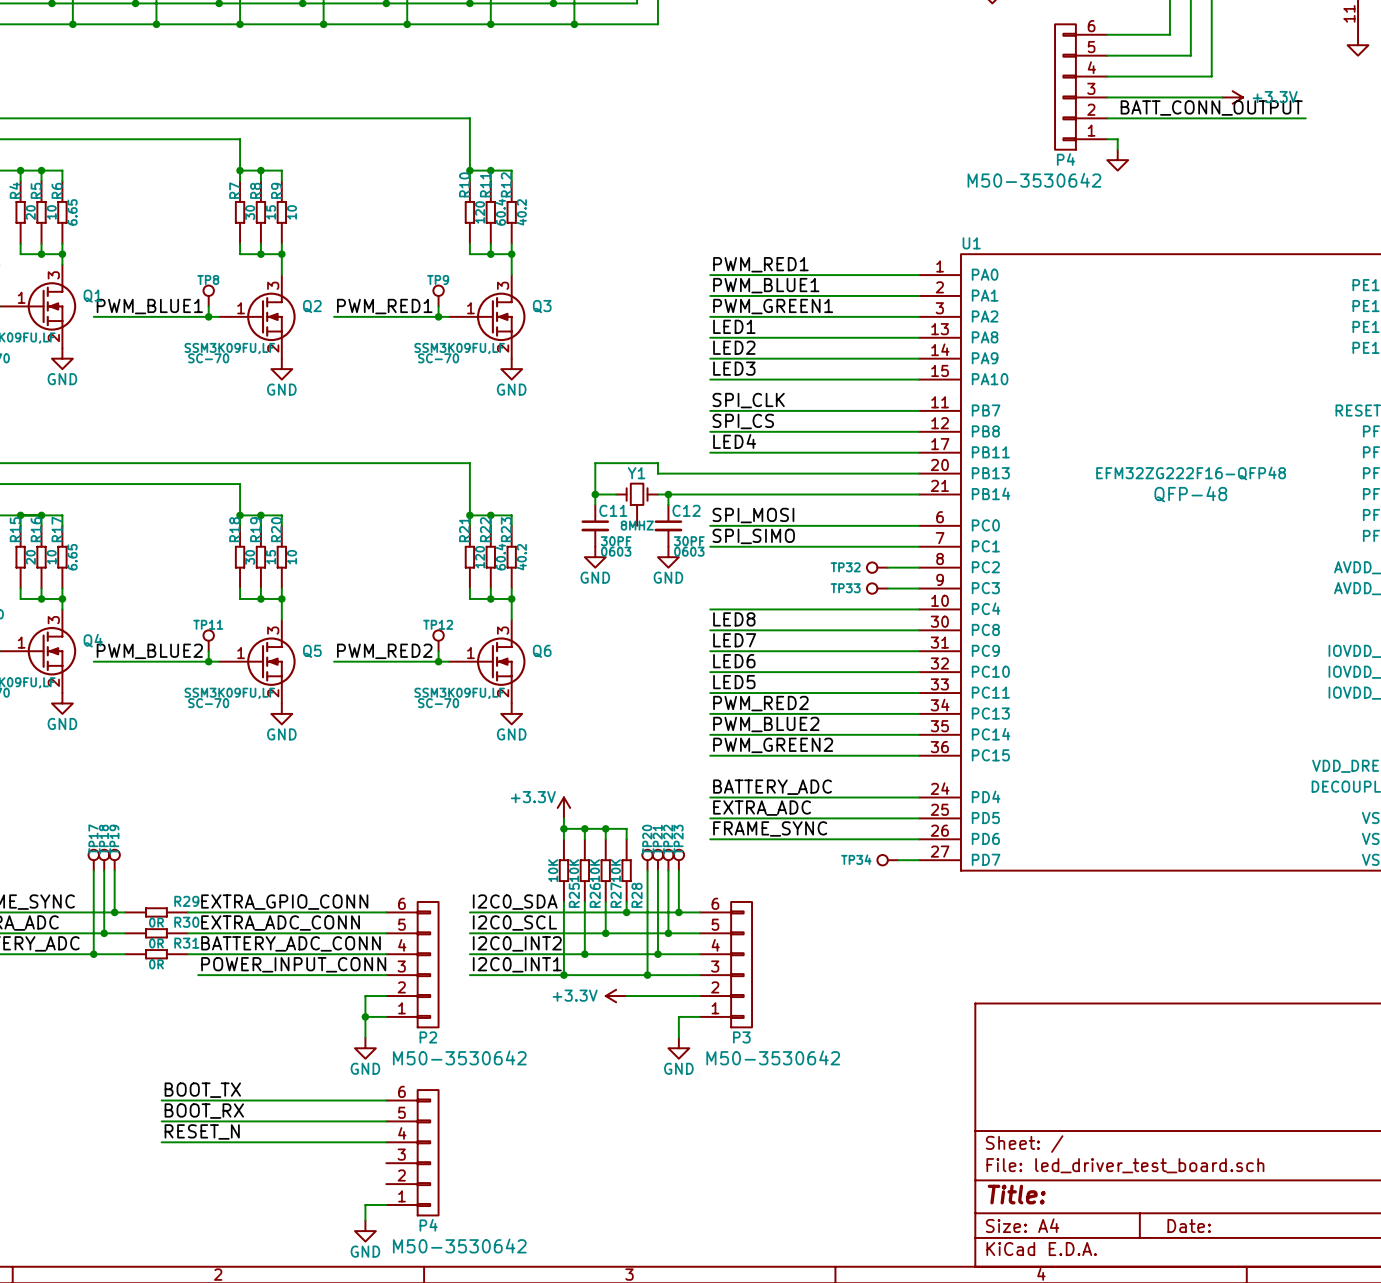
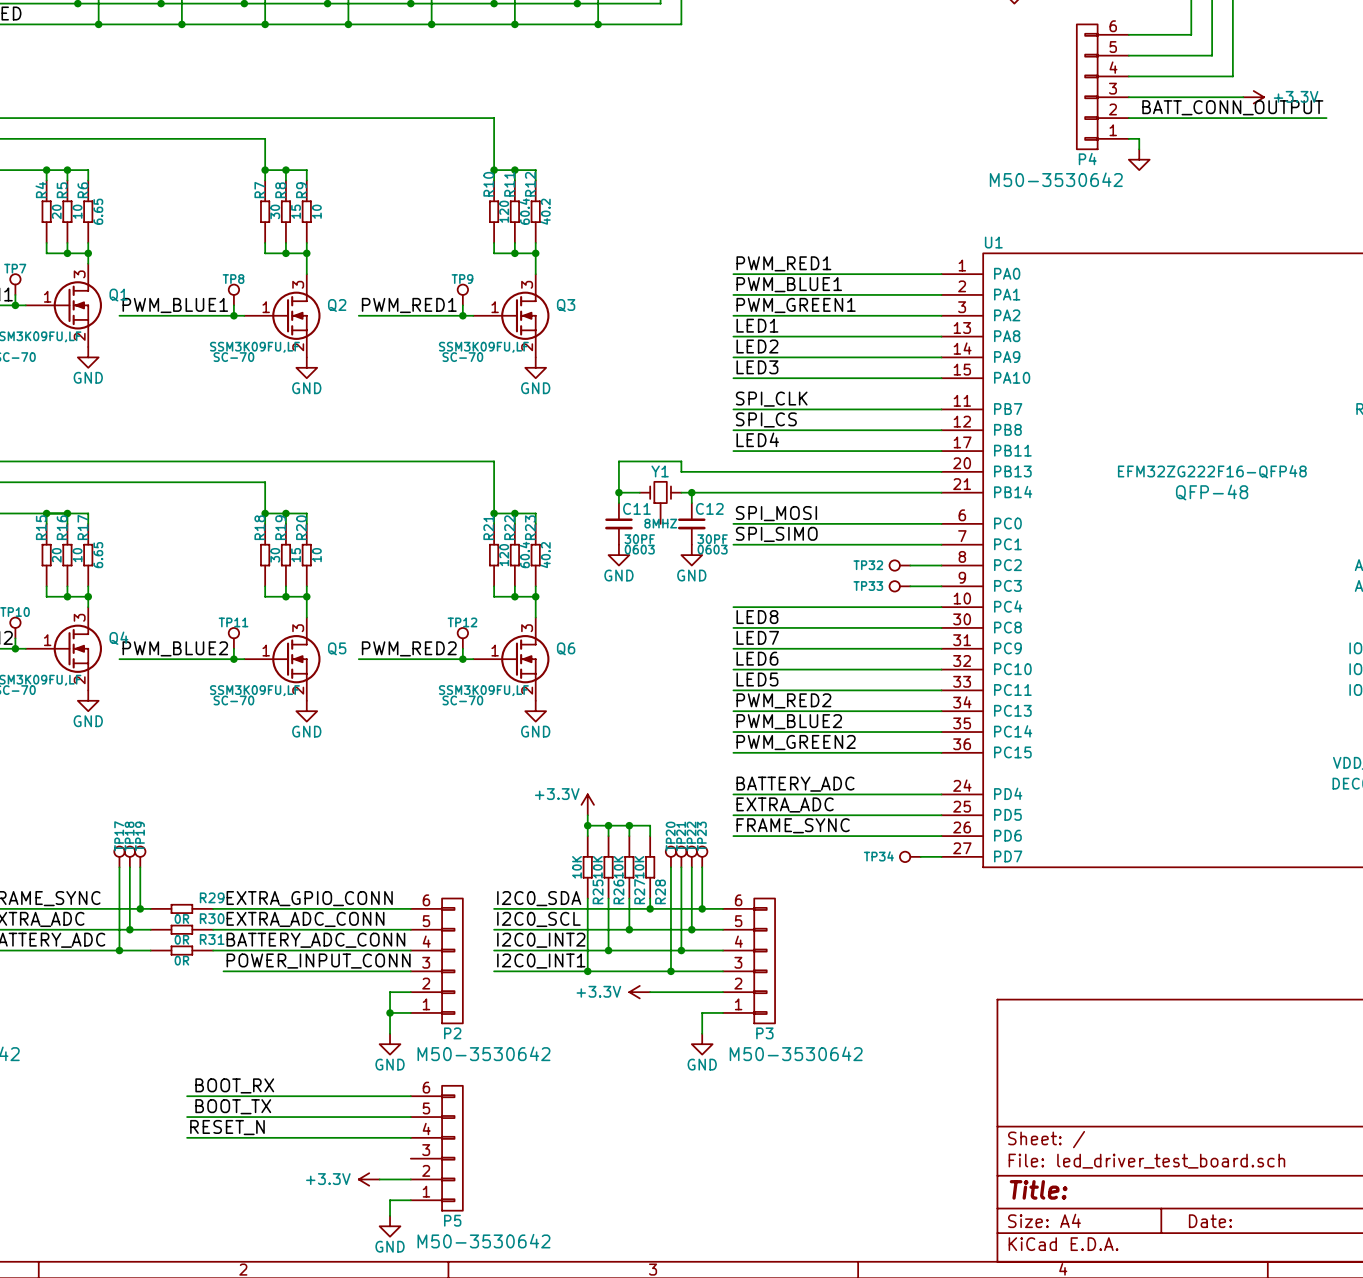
label: BOOT_TX (202, 1090) -> BOOT_RX (234, 1085)
label: BOOT_RX (204, 1111) -> BOOT_TX (233, 1106)
power symbol: none -> +3.3V (369, 1179)
wire: none -> (379, 1179) (410, 1179)
P4 name: P4 (428, 1225) -> P5 (452, 1220)

